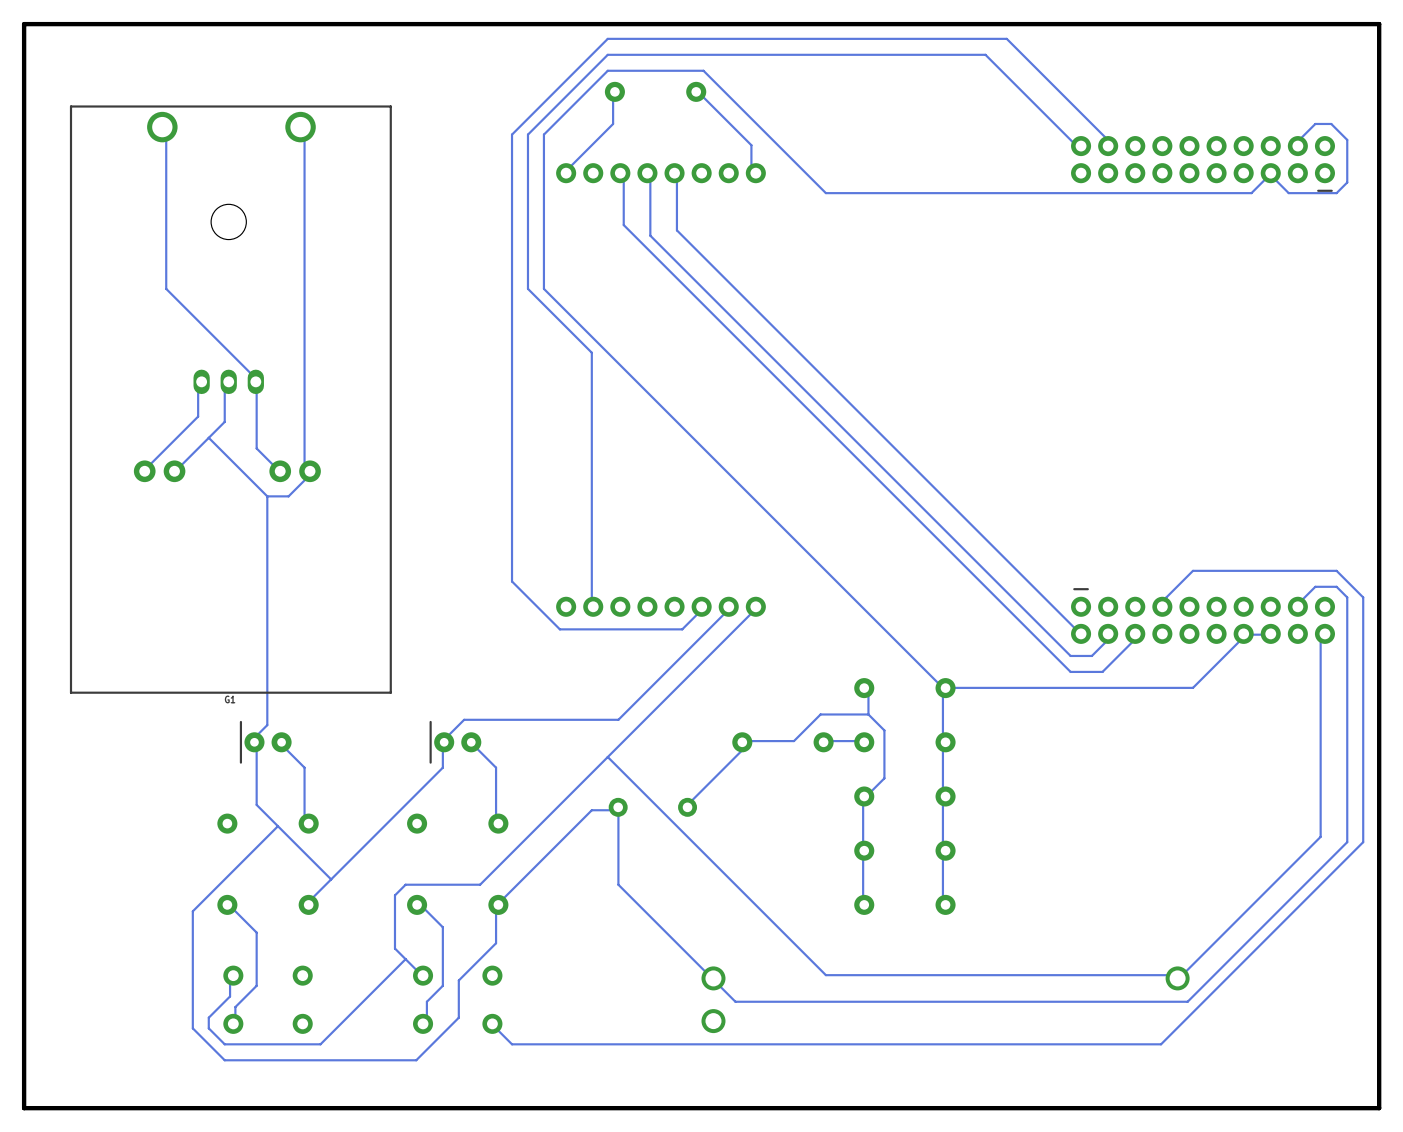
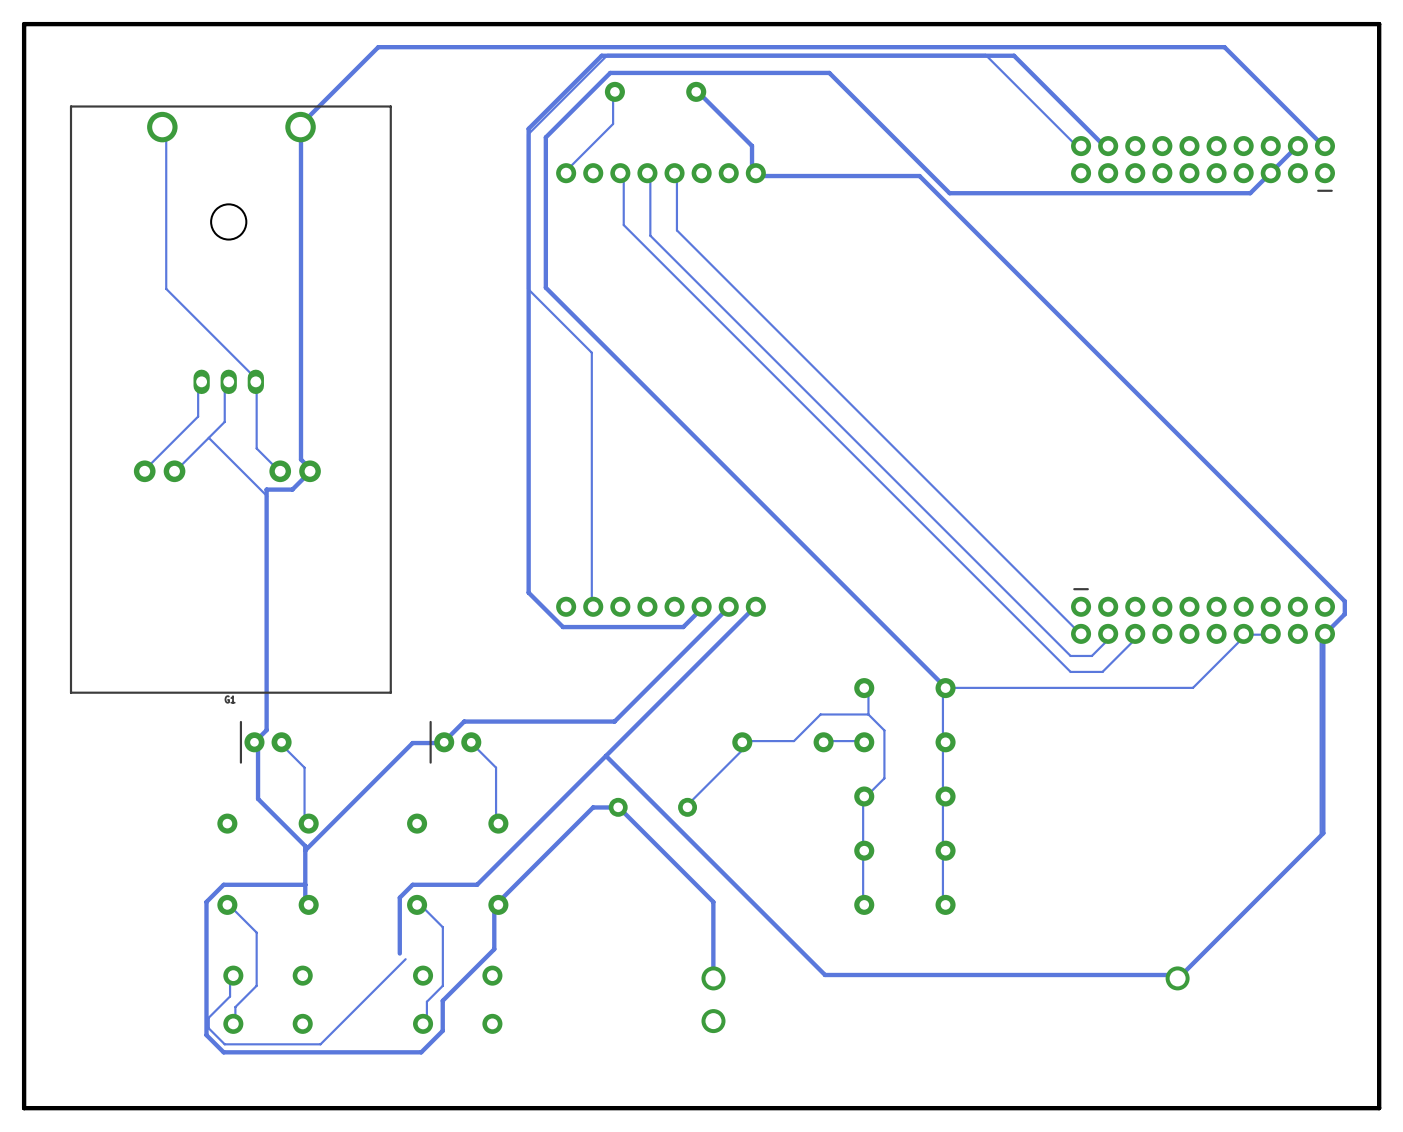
bottom track: (696, 91) (751, 145) (751, 171) (755, 173) -> (696, 91) (752, 145) (752, 171) (755, 173) (756, 176) (919, 176) (1344, 601) (1344, 614) (1323, 635) (1323, 833) (1177, 978) (1177, 975) (825, 975) (605, 755)
bottom track: (300, 127) (304, 129) (304, 464) (309, 469) (309, 475) (288, 496) (267, 496) (267, 725) (251, 741) (256, 746) (256, 804) (331, 879) -> none
bottom track: (1108, 146) (1113, 145) (1006, 38) (607, 38) (512, 134) (512, 581) (559, 629) (682, 629) (698, 613) (698, 608) (701, 606) -> (1108, 146) (1104, 145) (1014, 55) (601, 55) (528, 128) (528, 592) (563, 627) (683, 627) (701, 606)
bottom track: (1297, 146) (1299, 139) (1315, 123) (1331, 123) (1347, 139) (1347, 182) (1336, 193) (1288, 193) (1270, 173) (1251, 193) (825, 193) (703, 70) (607, 70) (543, 134) (543, 288) (942, 687) (945, 688) -> (1297, 146) (1297, 150) (1293, 150) (1250, 193) (949, 193) (829, 72) (610, 72) (545, 137) (545, 287) (945, 688)
bottom track: none -> (1324, 146) (1224, 47) (378, 47) (300, 124) (300, 459) (309, 468) (310, 471) (292, 489) (266, 489) (266, 730) (254, 742) (258, 743) (258, 798) (305, 846) (305, 901) (308, 904)
bottom track: (728, 606) (724, 608) (724, 613) (618, 719) (464, 719) (442, 741) (442, 767) (309, 900) (308, 904) -> (728, 606) (614, 721) (464, 721) (442, 743) (412, 743) (305, 850)
bottom track: (755, 606) (751, 608) (751, 613) (480, 884) (405, 884) (394, 895) (394, 948) (423, 975) -> (755, 606) (477, 884) (412, 884) (399, 897) (399, 953)
bottom track: (1162, 606) (1166, 602) (1166, 597) (1192, 570) (1336, 570) (1363, 597) (1363, 842) (1161, 1044) (512, 1044) (492, 1023) -> none
bottom track: (1297, 606) (1299, 602) (1315, 586) (1336, 586) (1347, 597) (1347, 842) (1187, 1001) (735, 1001) (618, 884) (618, 807) (613, 810) (591, 810) (496, 906) (496, 943) (458, 980) (458, 1017) (416, 1060) (224, 1060) (192, 1028) (192, 911) (277, 826) -> none
bottom track: none -> (305, 884) (223, 884) (206, 901) (206, 1035) (223, 1052) (421, 1052) (442, 1030) (442, 1000) (494, 949) (494, 906) (498, 904) (498, 901) (593, 807) (618, 807) (713, 901) (713, 978)

